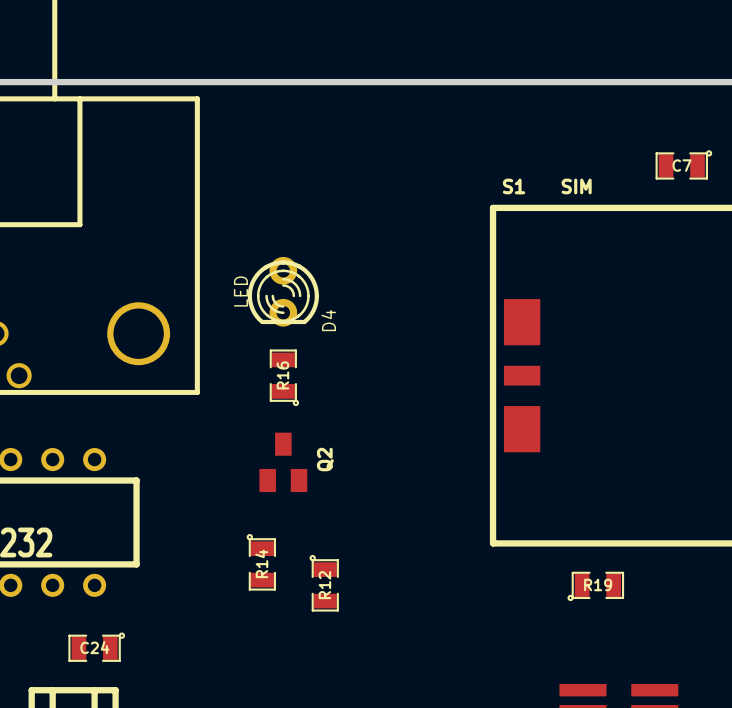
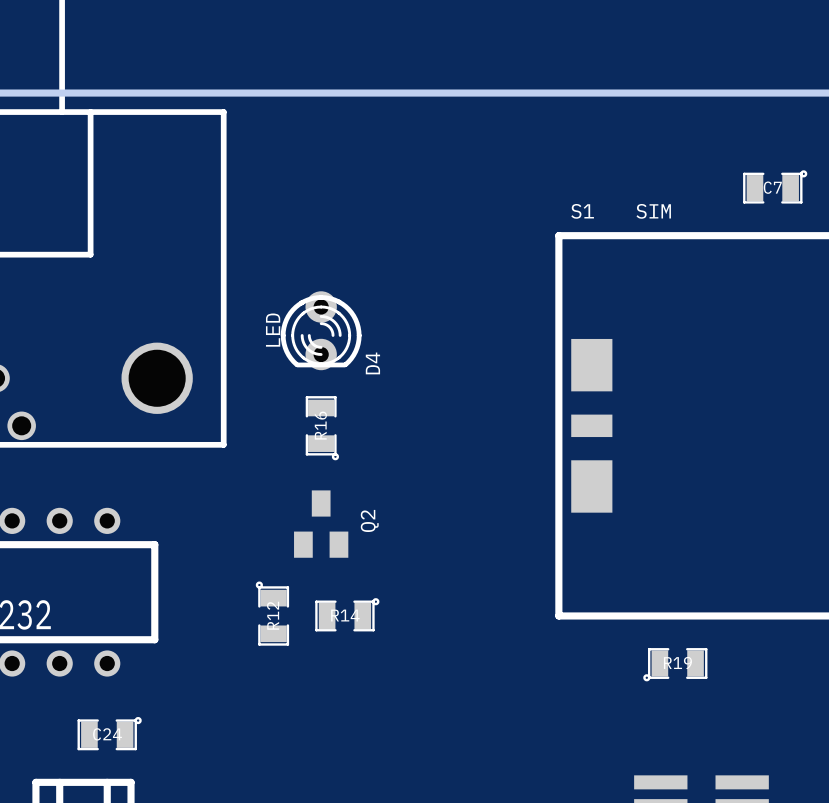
R14 rotation: 0° (261, 562) -> 90° clockwise (347, 614)
R14 position: (261, 562) -> (347, 614)
R12 position: (324, 583) -> (272, 613)

